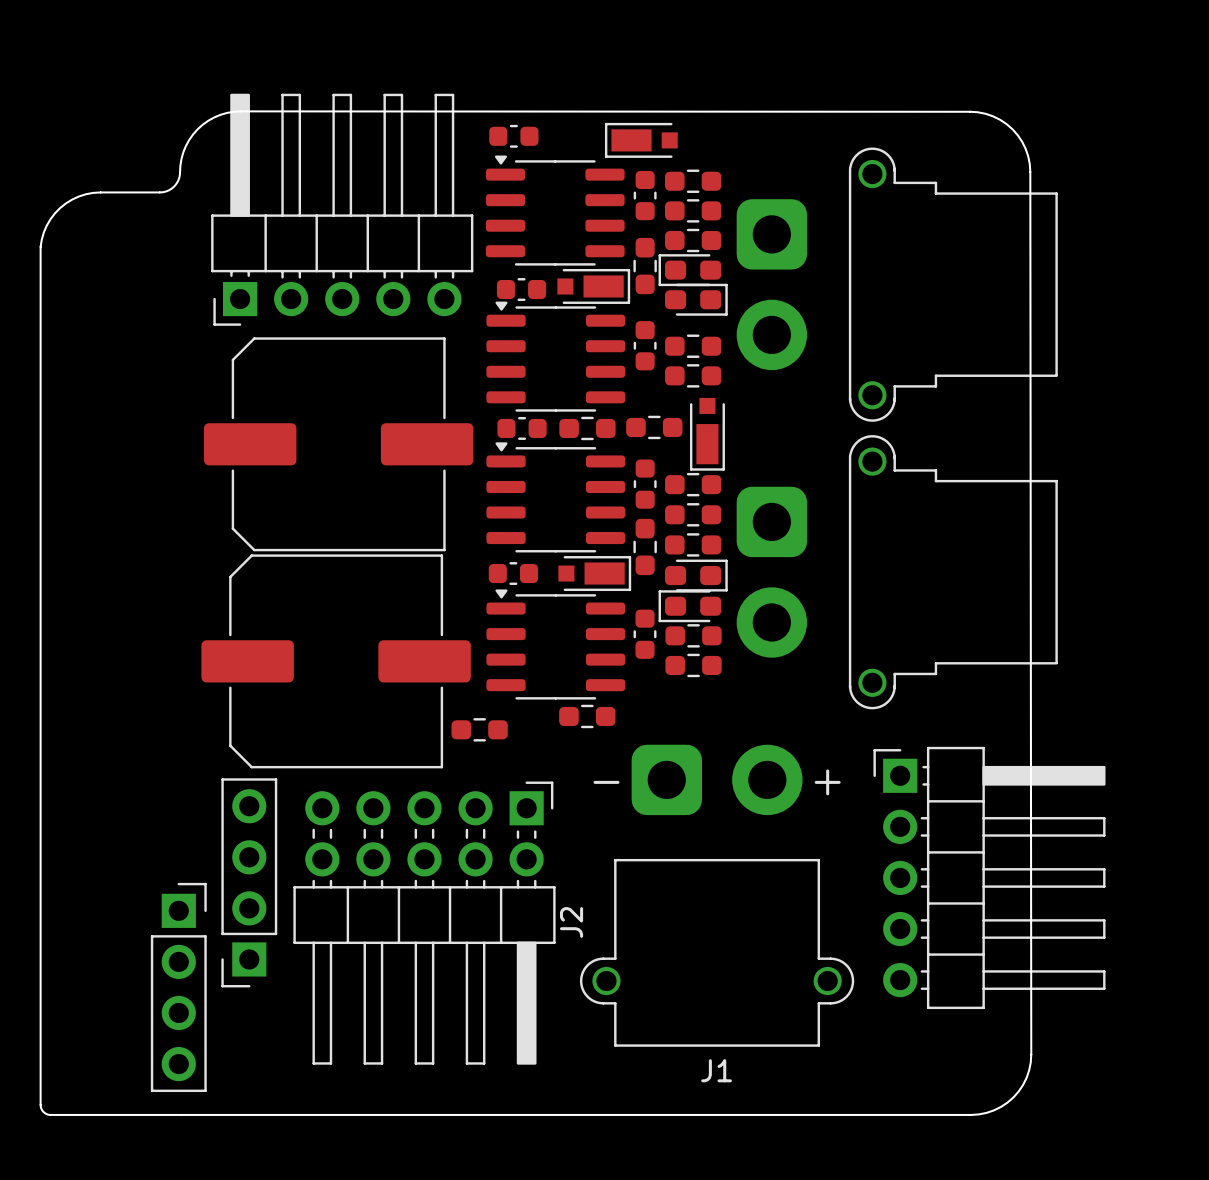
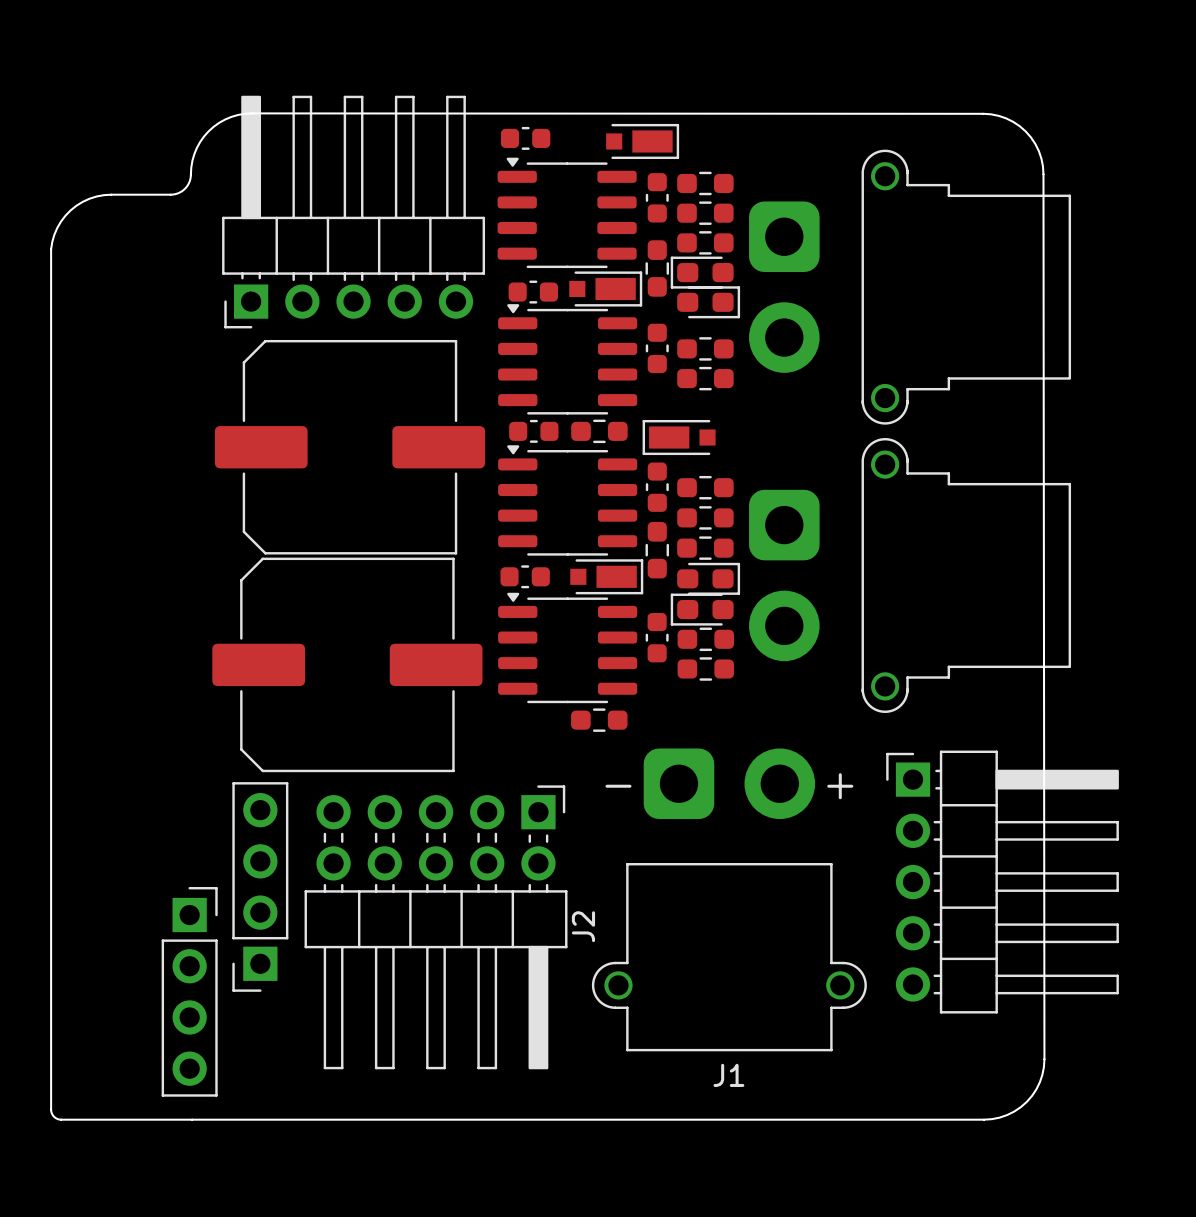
part rotation: 0° (641, 140) -> 180° (642, 141)
part footprint: [626, 415, 683, 440] -> [642, 419, 716, 456]
part: (707, 434) -> none
part: (479, 729) -> none

